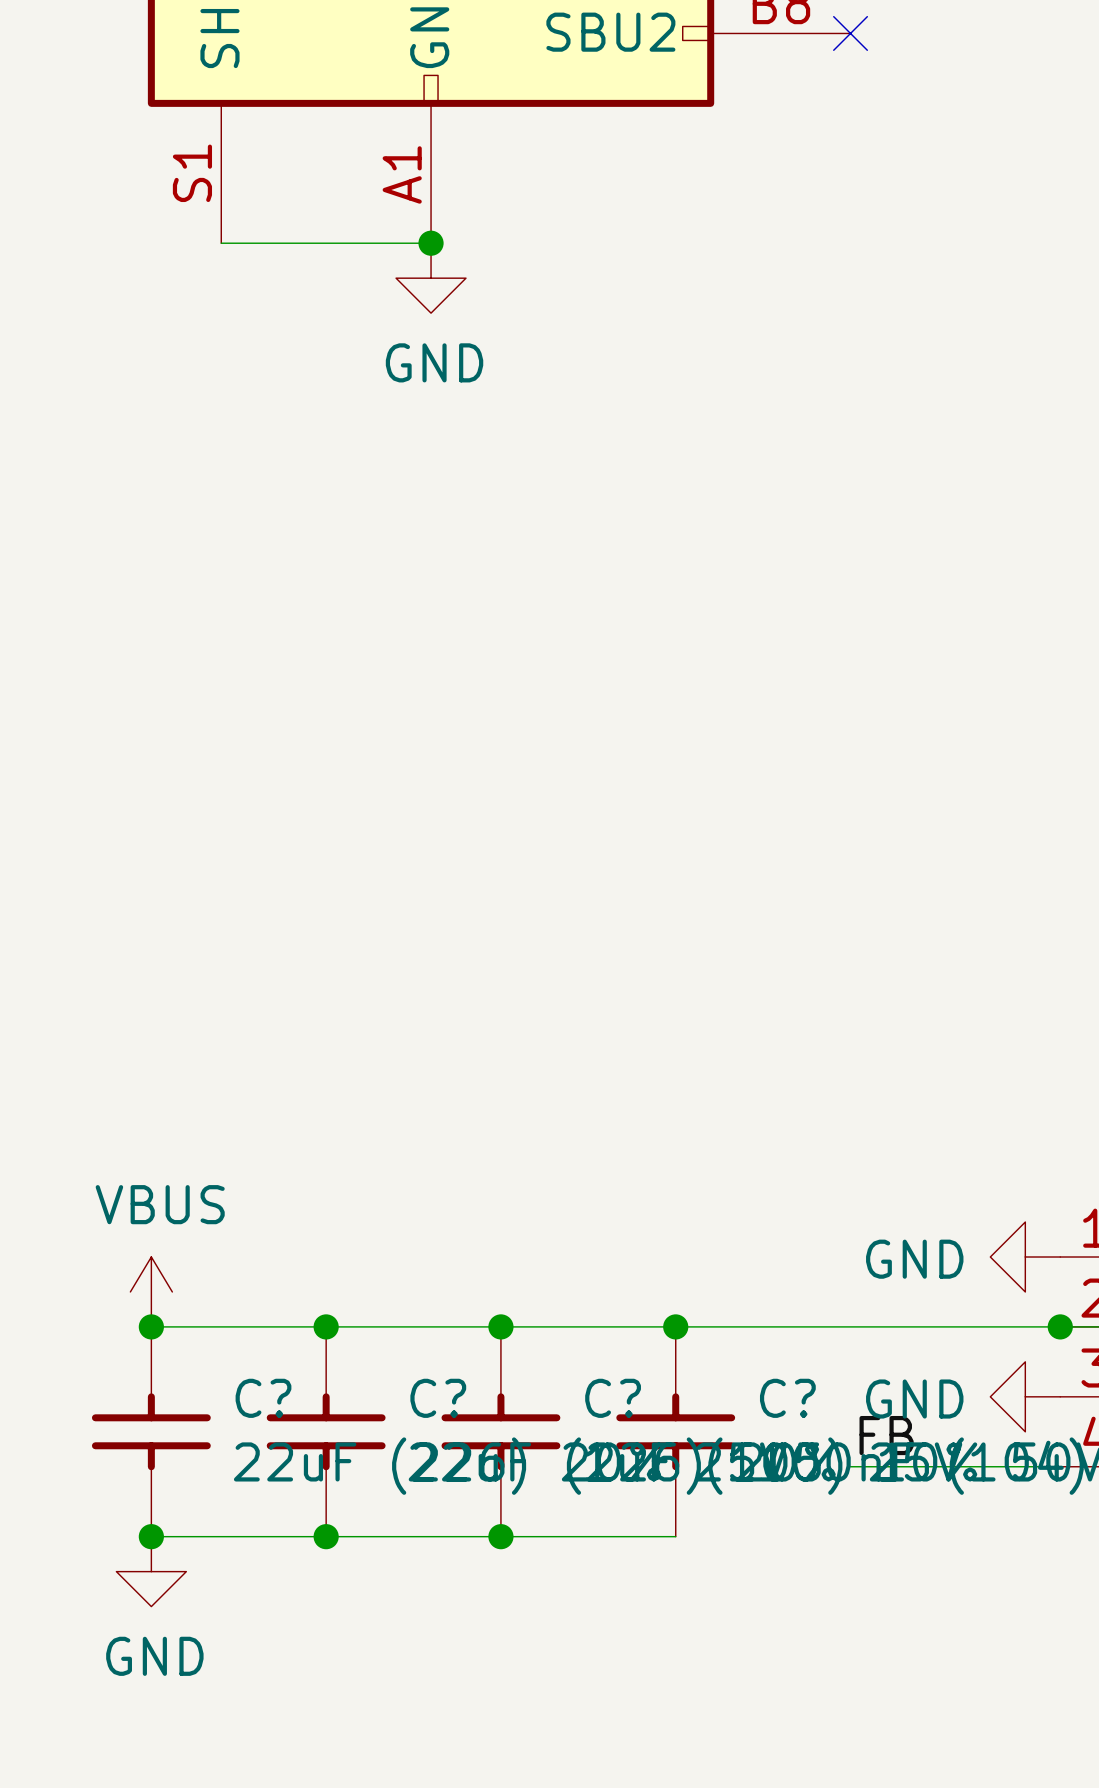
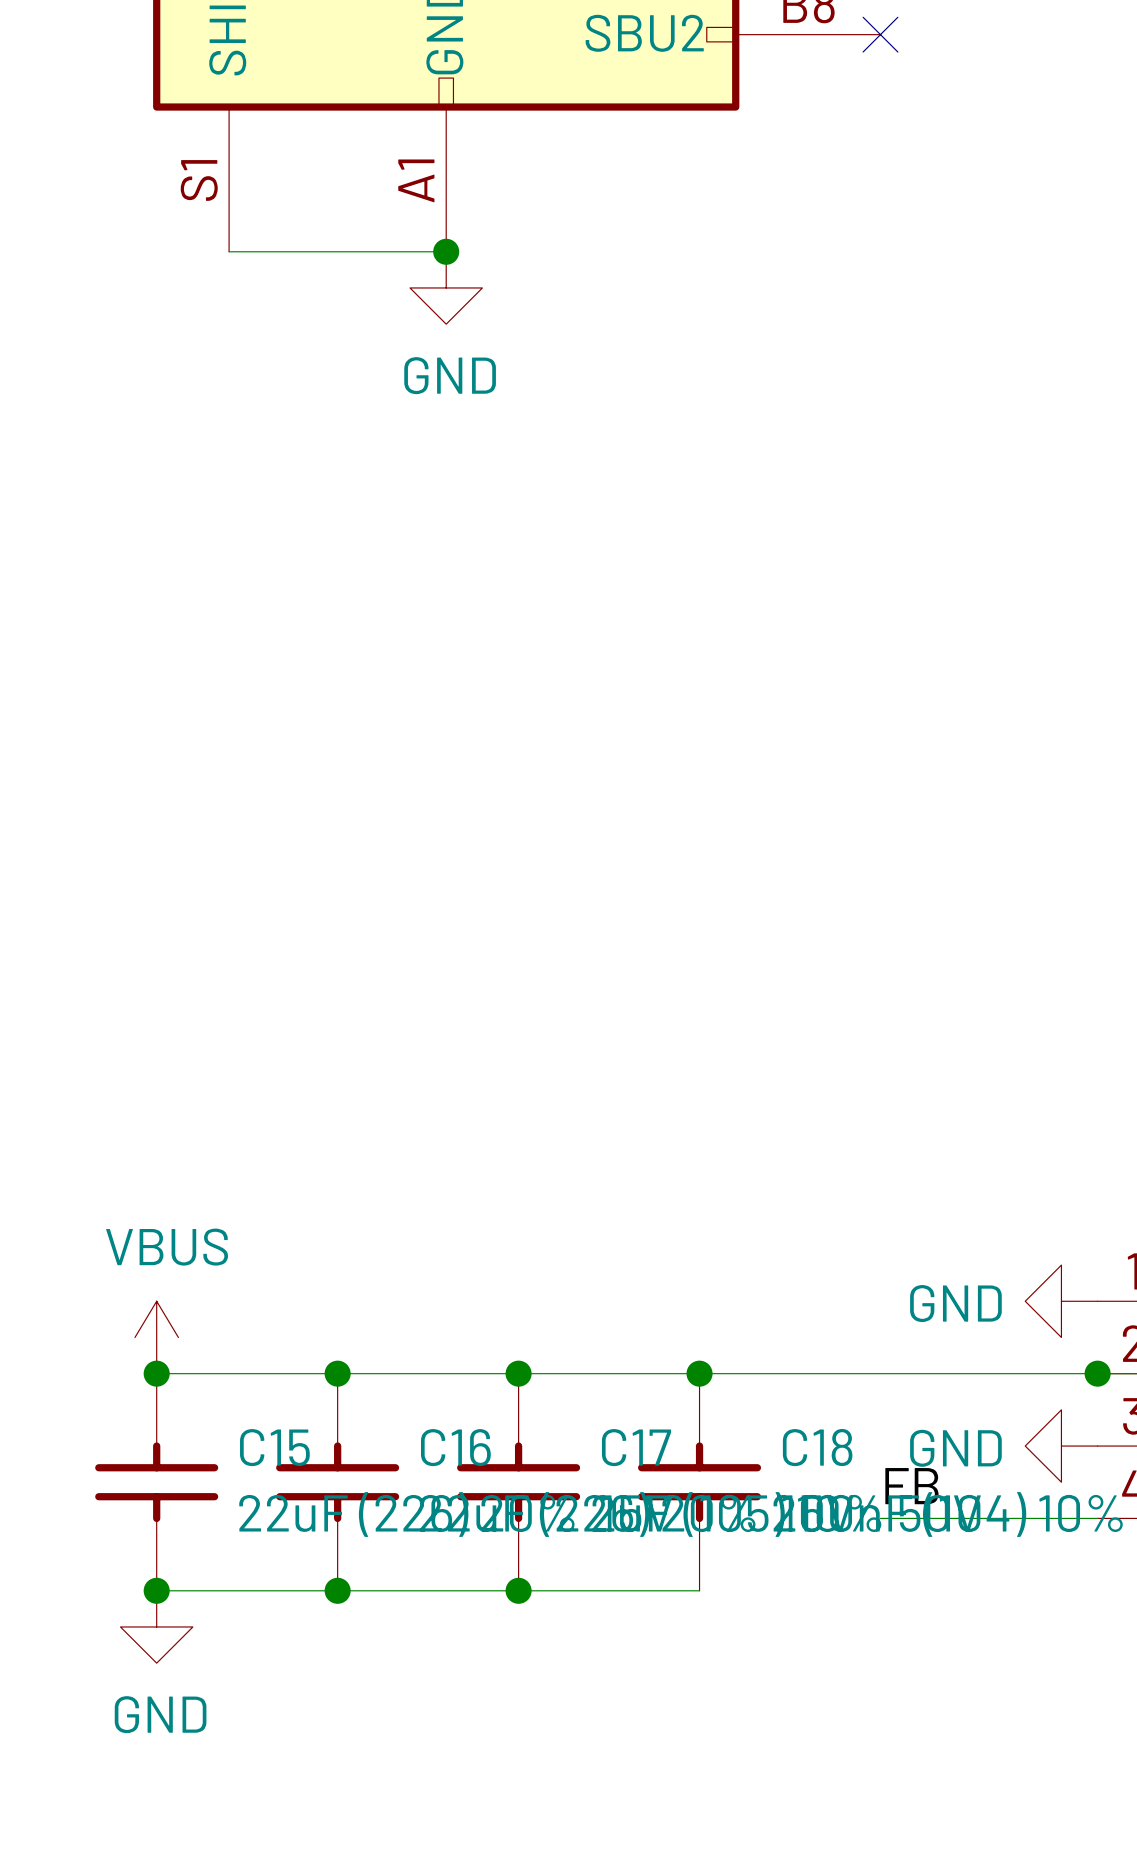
C? name: C? (263, 1398) -> C15 (274, 1447)
C? name: C? (438, 1398) -> C16 (455, 1447)
C? name: C? (613, 1398) -> C17 (636, 1447)
C? name: C? (787, 1398) -> C18 (817, 1447)

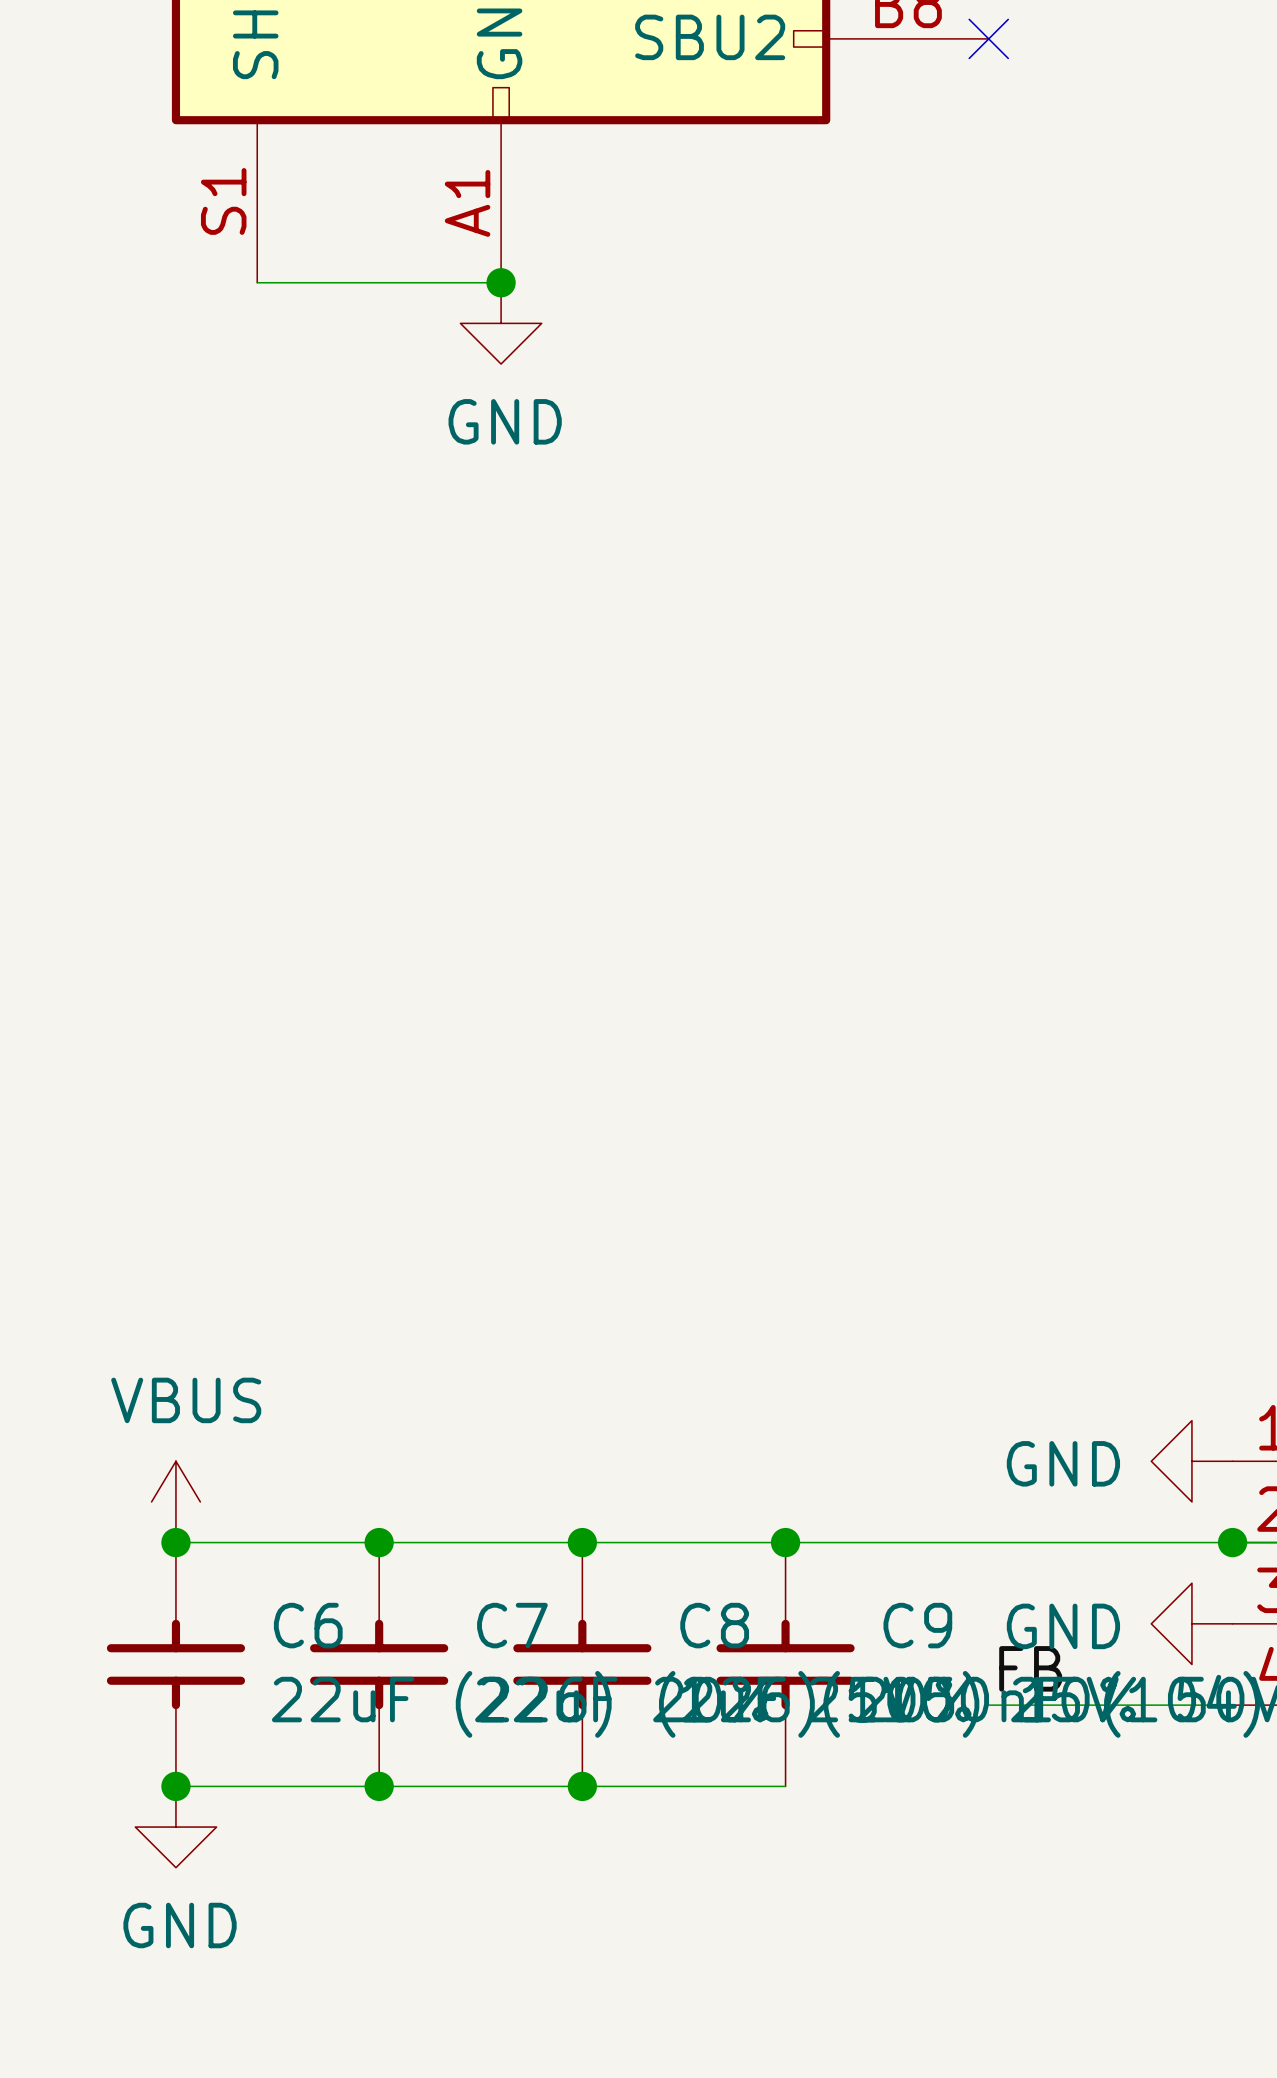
C15 name: C15 (274, 1447) -> C6 (308, 1625)
C16 name: C16 (455, 1447) -> C7 (512, 1625)
C17 name: C17 (636, 1447) -> C8 (714, 1625)
C18 name: C18 (817, 1447) -> C9 (917, 1625)

